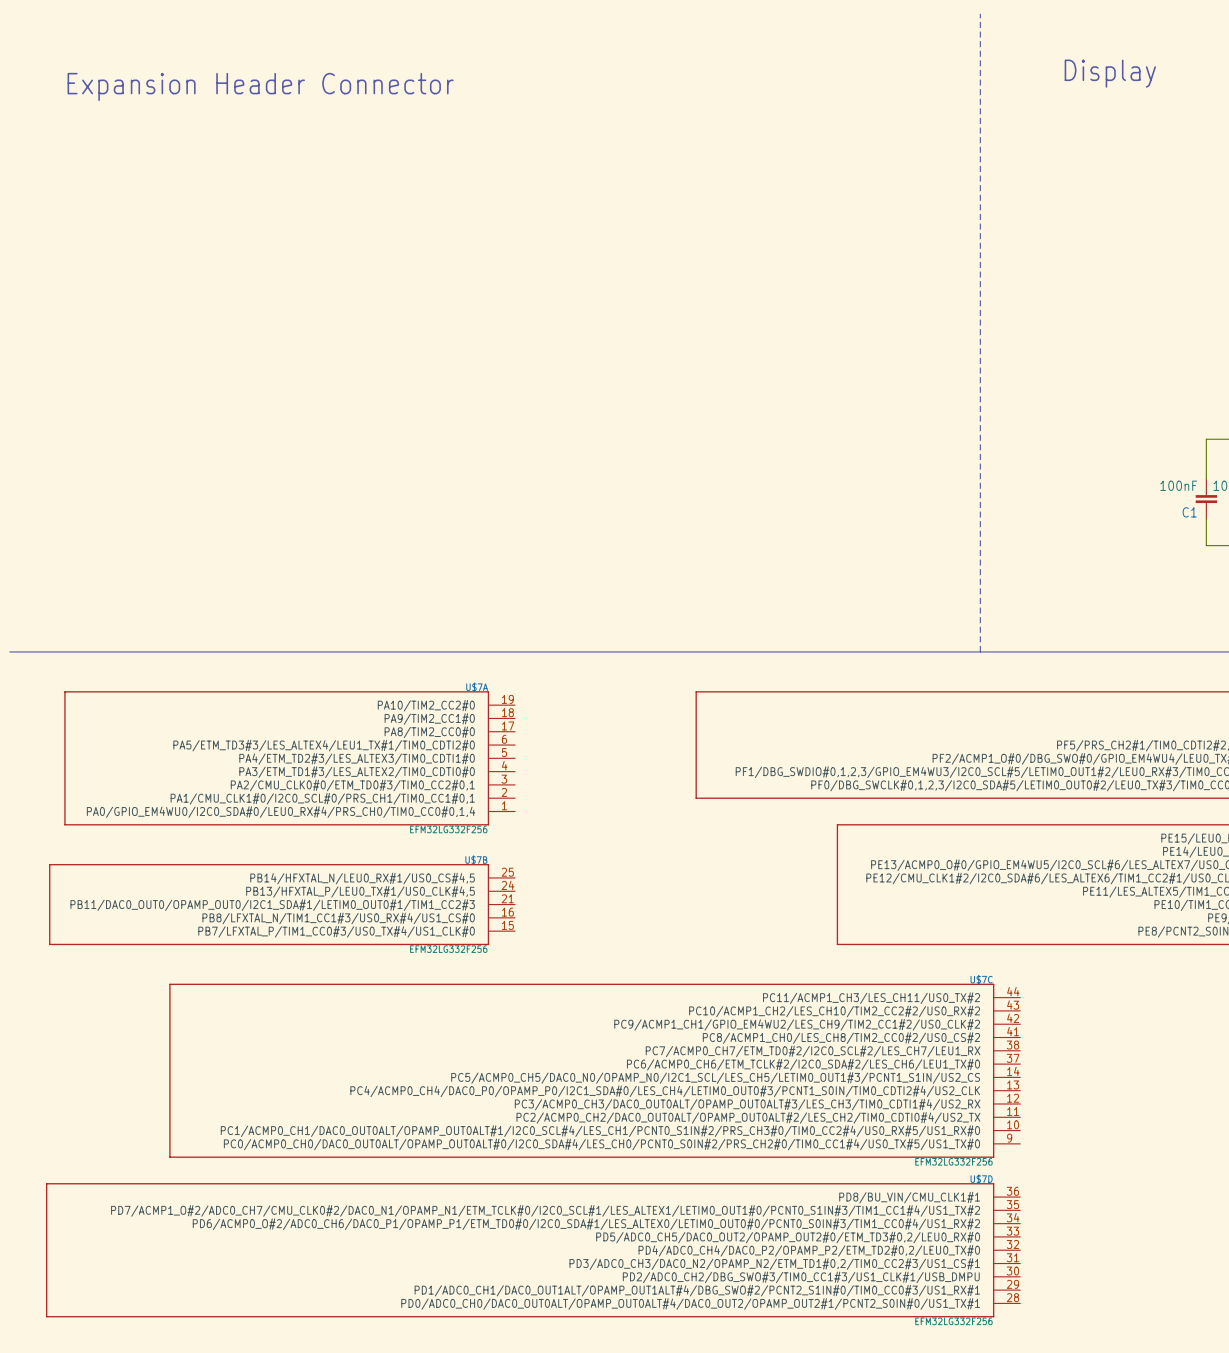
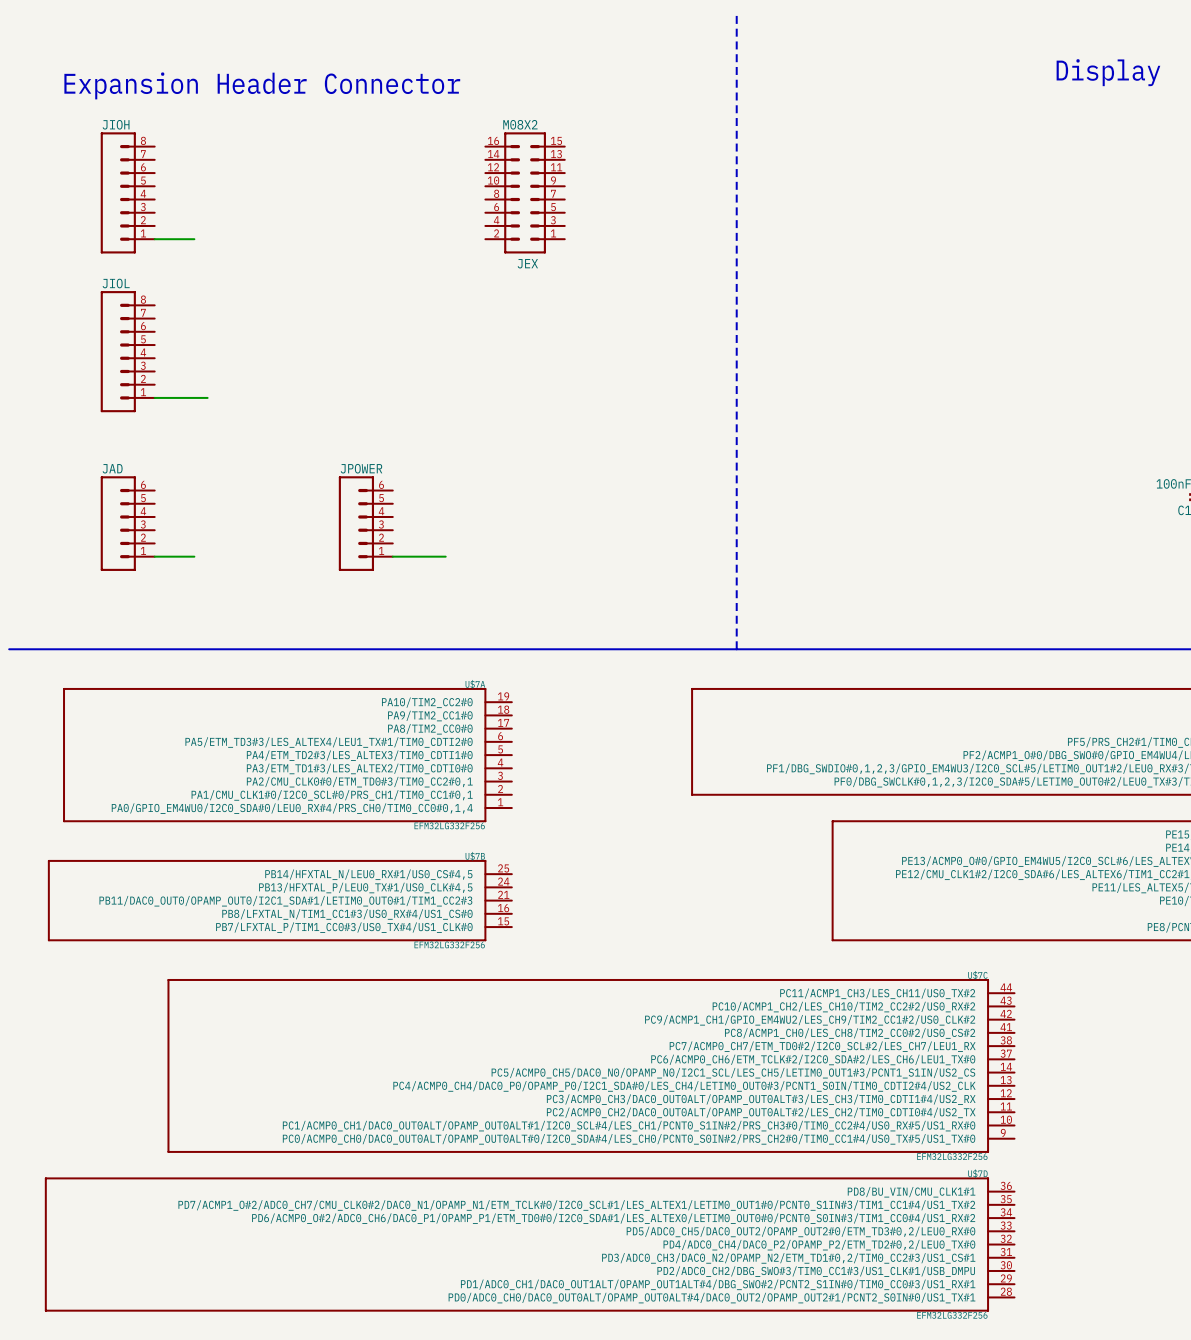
line: none -> (736, 14) (736, 649)
line: (980, 13) (980, 651) -> none
JIOH: none -> (127, 192)
JEX: none -> M08X2 (525, 192)
wire: none -> (154, 239) (194, 239)
JIOL: none -> (127, 351)
wire: none -> (154, 397) (207, 397)
JAD: none -> (127, 523)
JPOWER: none -> (365, 523)
wire: none -> (154, 556) (194, 556)
wire: none -> (392, 556) (445, 556)

